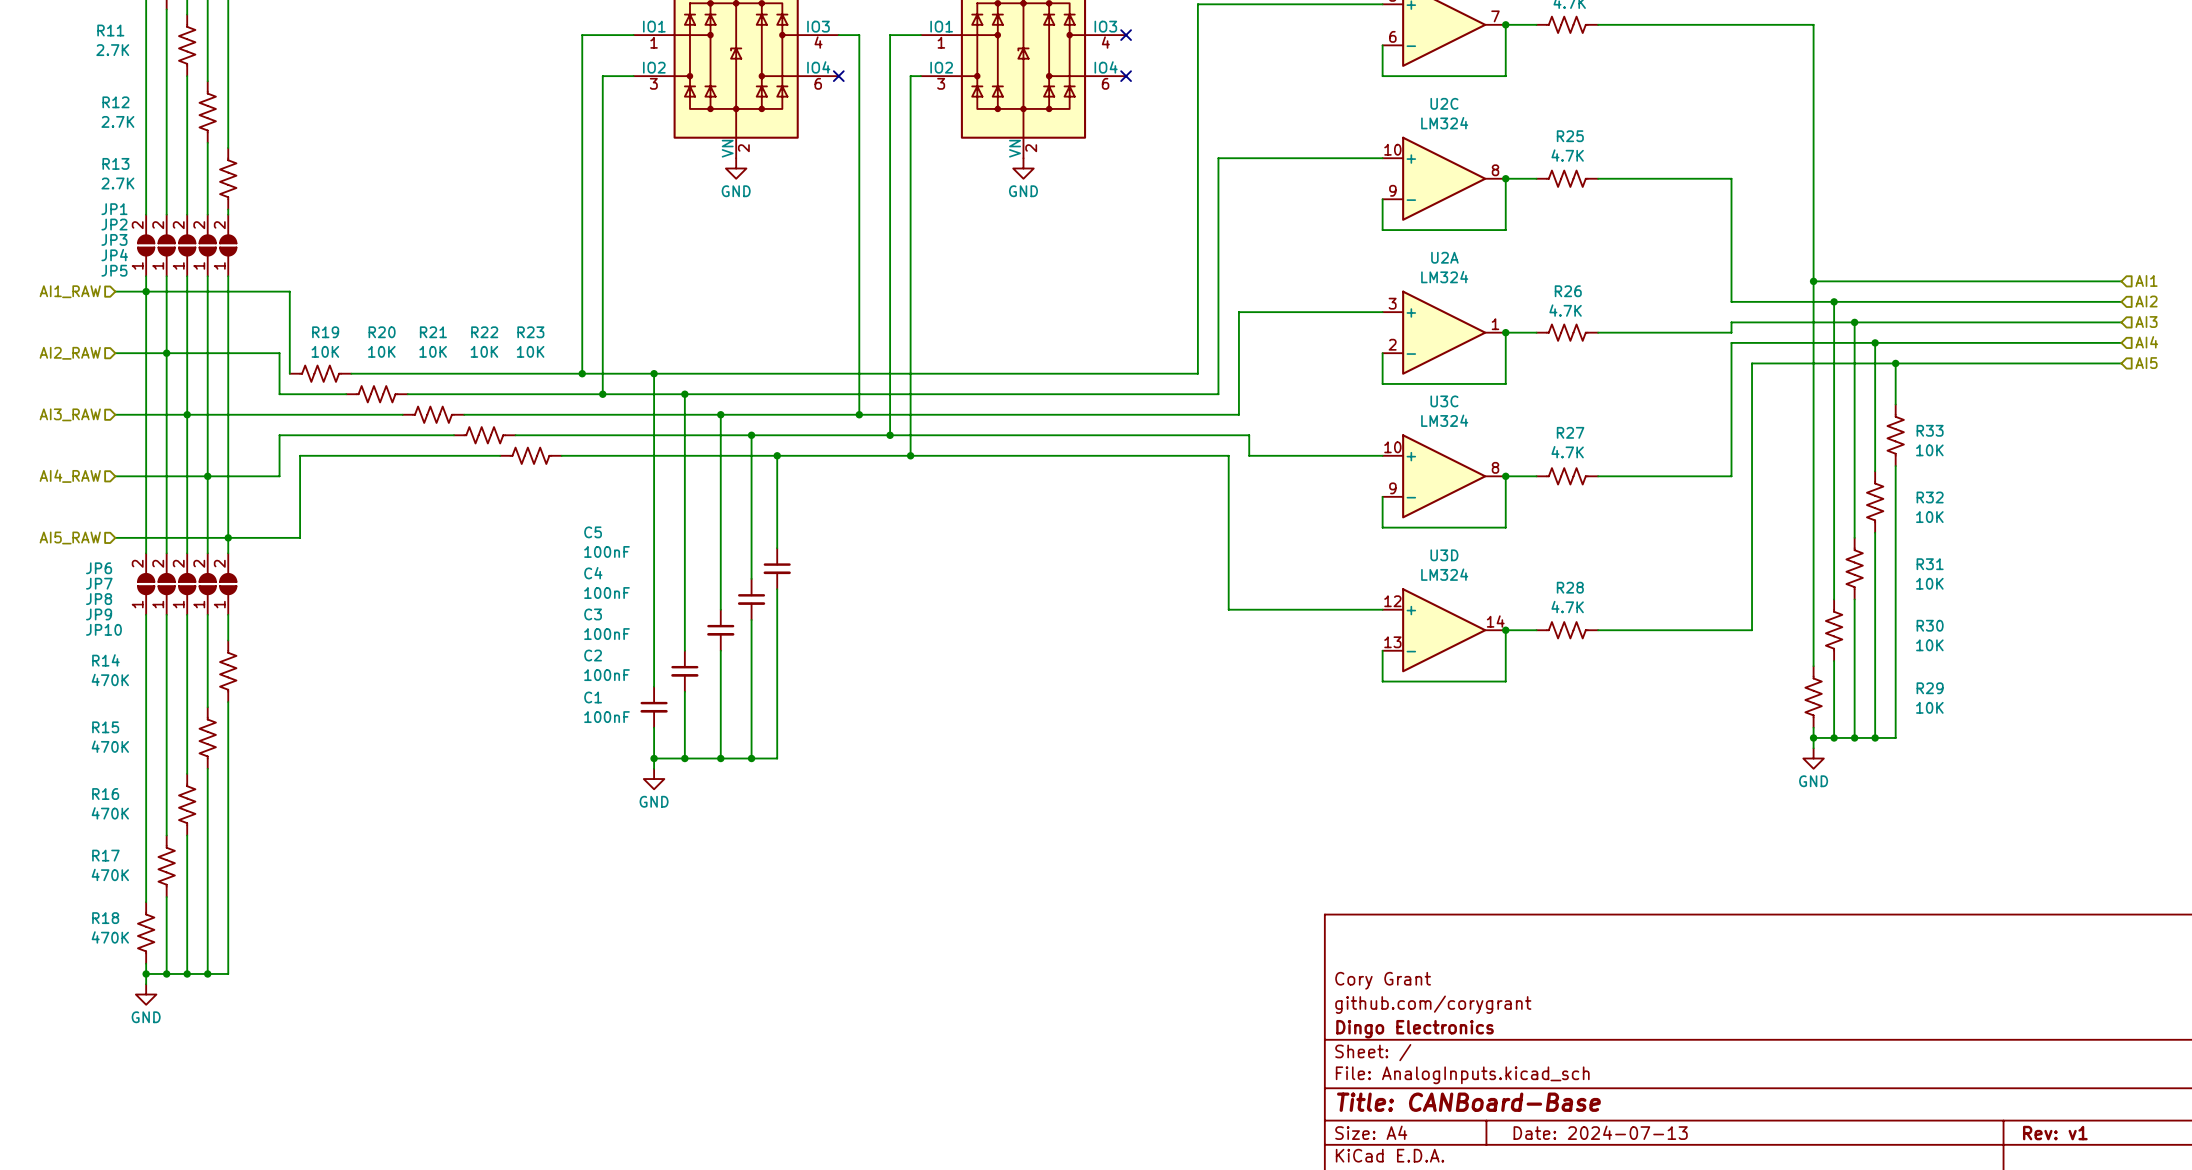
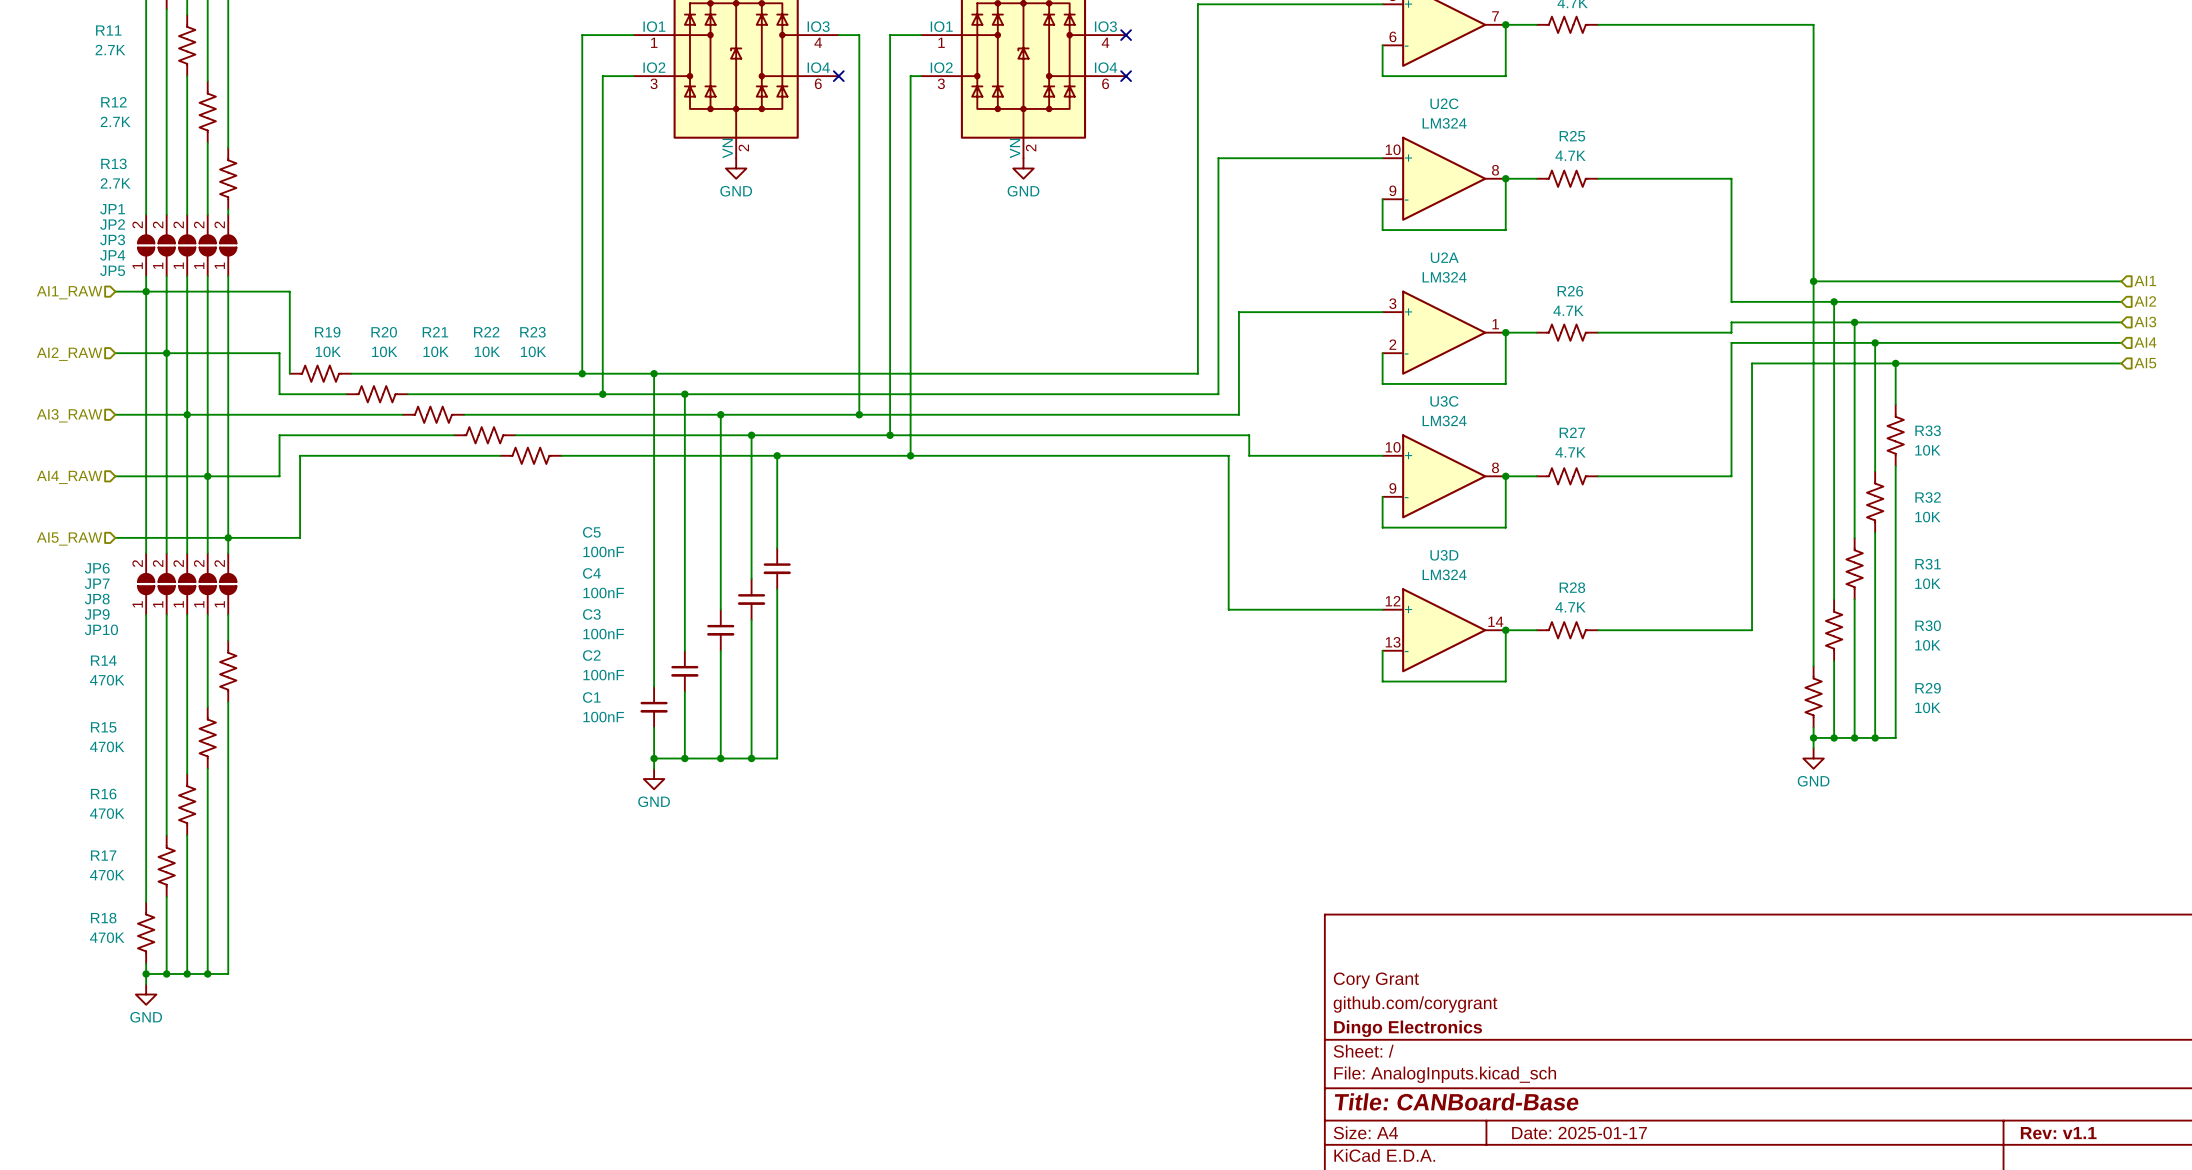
title block: Date: 2024-07-13 (1600, 1132) -> Date: 2025-01-17 (1579, 1133)
title block: Rev: v1 (2055, 1133) -> Rev: v1.1 (2058, 1133)

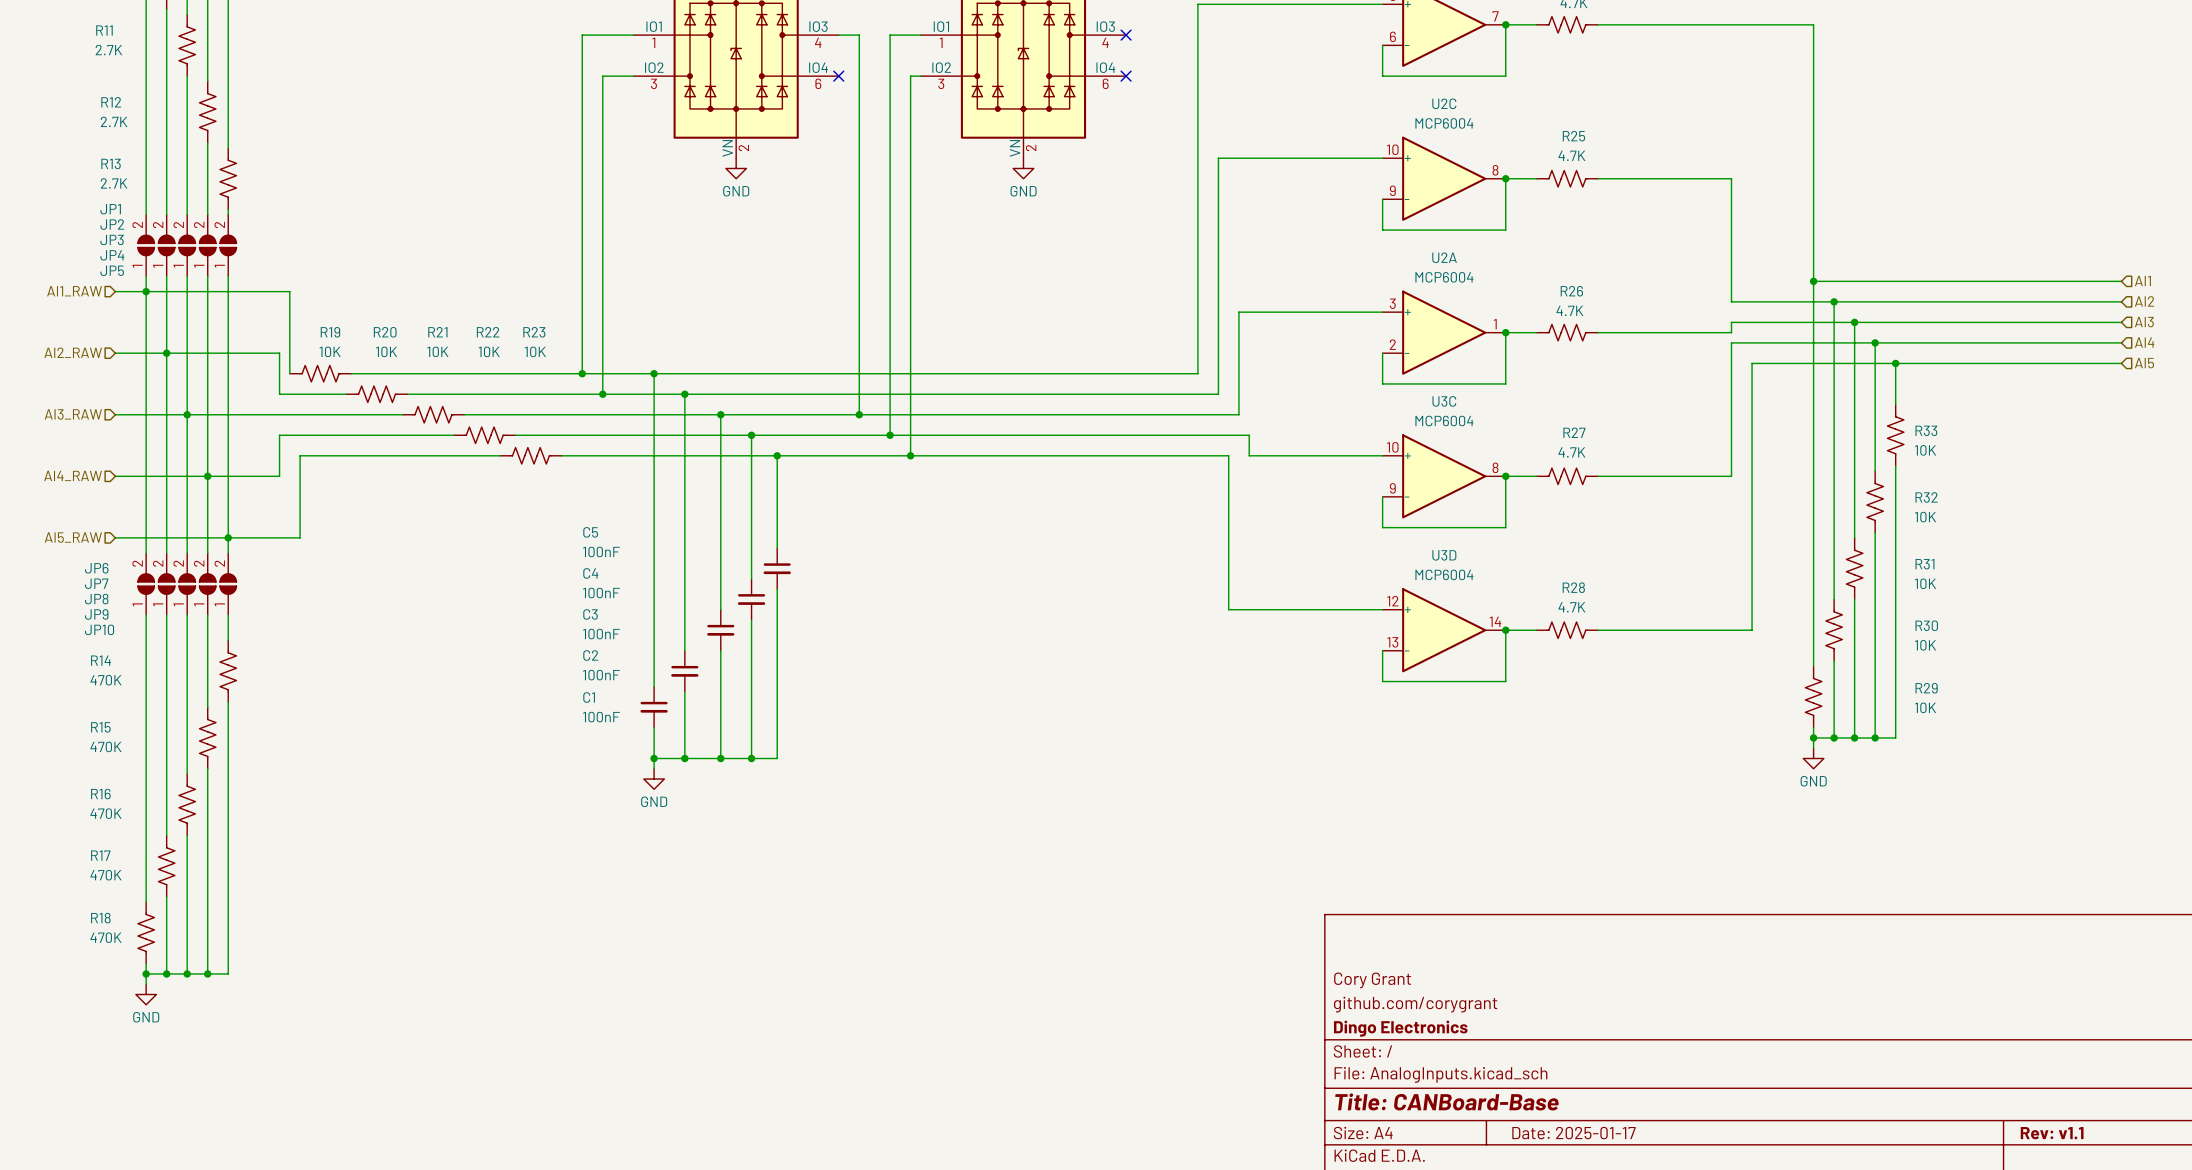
U2C value: LM324 (1444, 123) -> MCP6004 (1444, 123)
U2A value: LM324 (1444, 277) -> MCP6004 (1444, 277)
U3C value: LM324 (1444, 420) -> MCP6004 (1444, 421)
U3D value: LM324 (1444, 574) -> MCP6004 (1444, 574)

